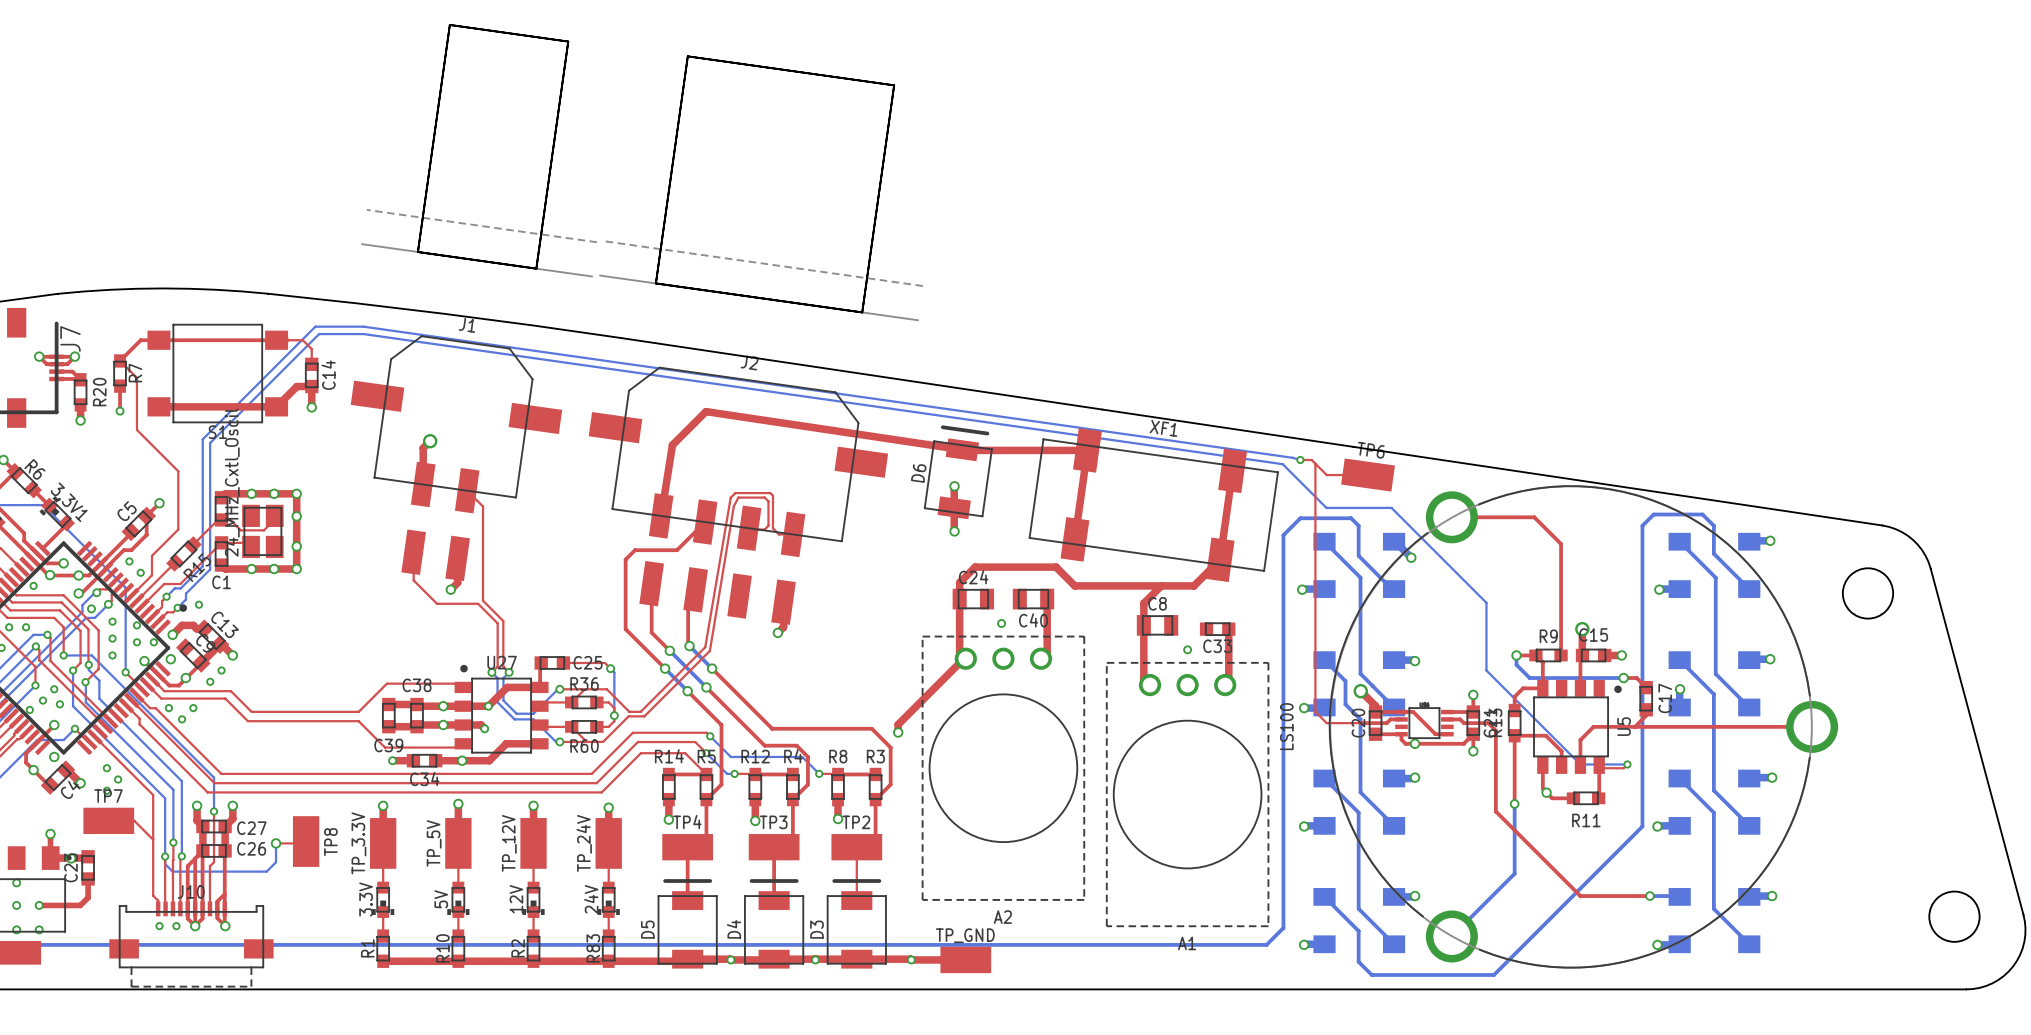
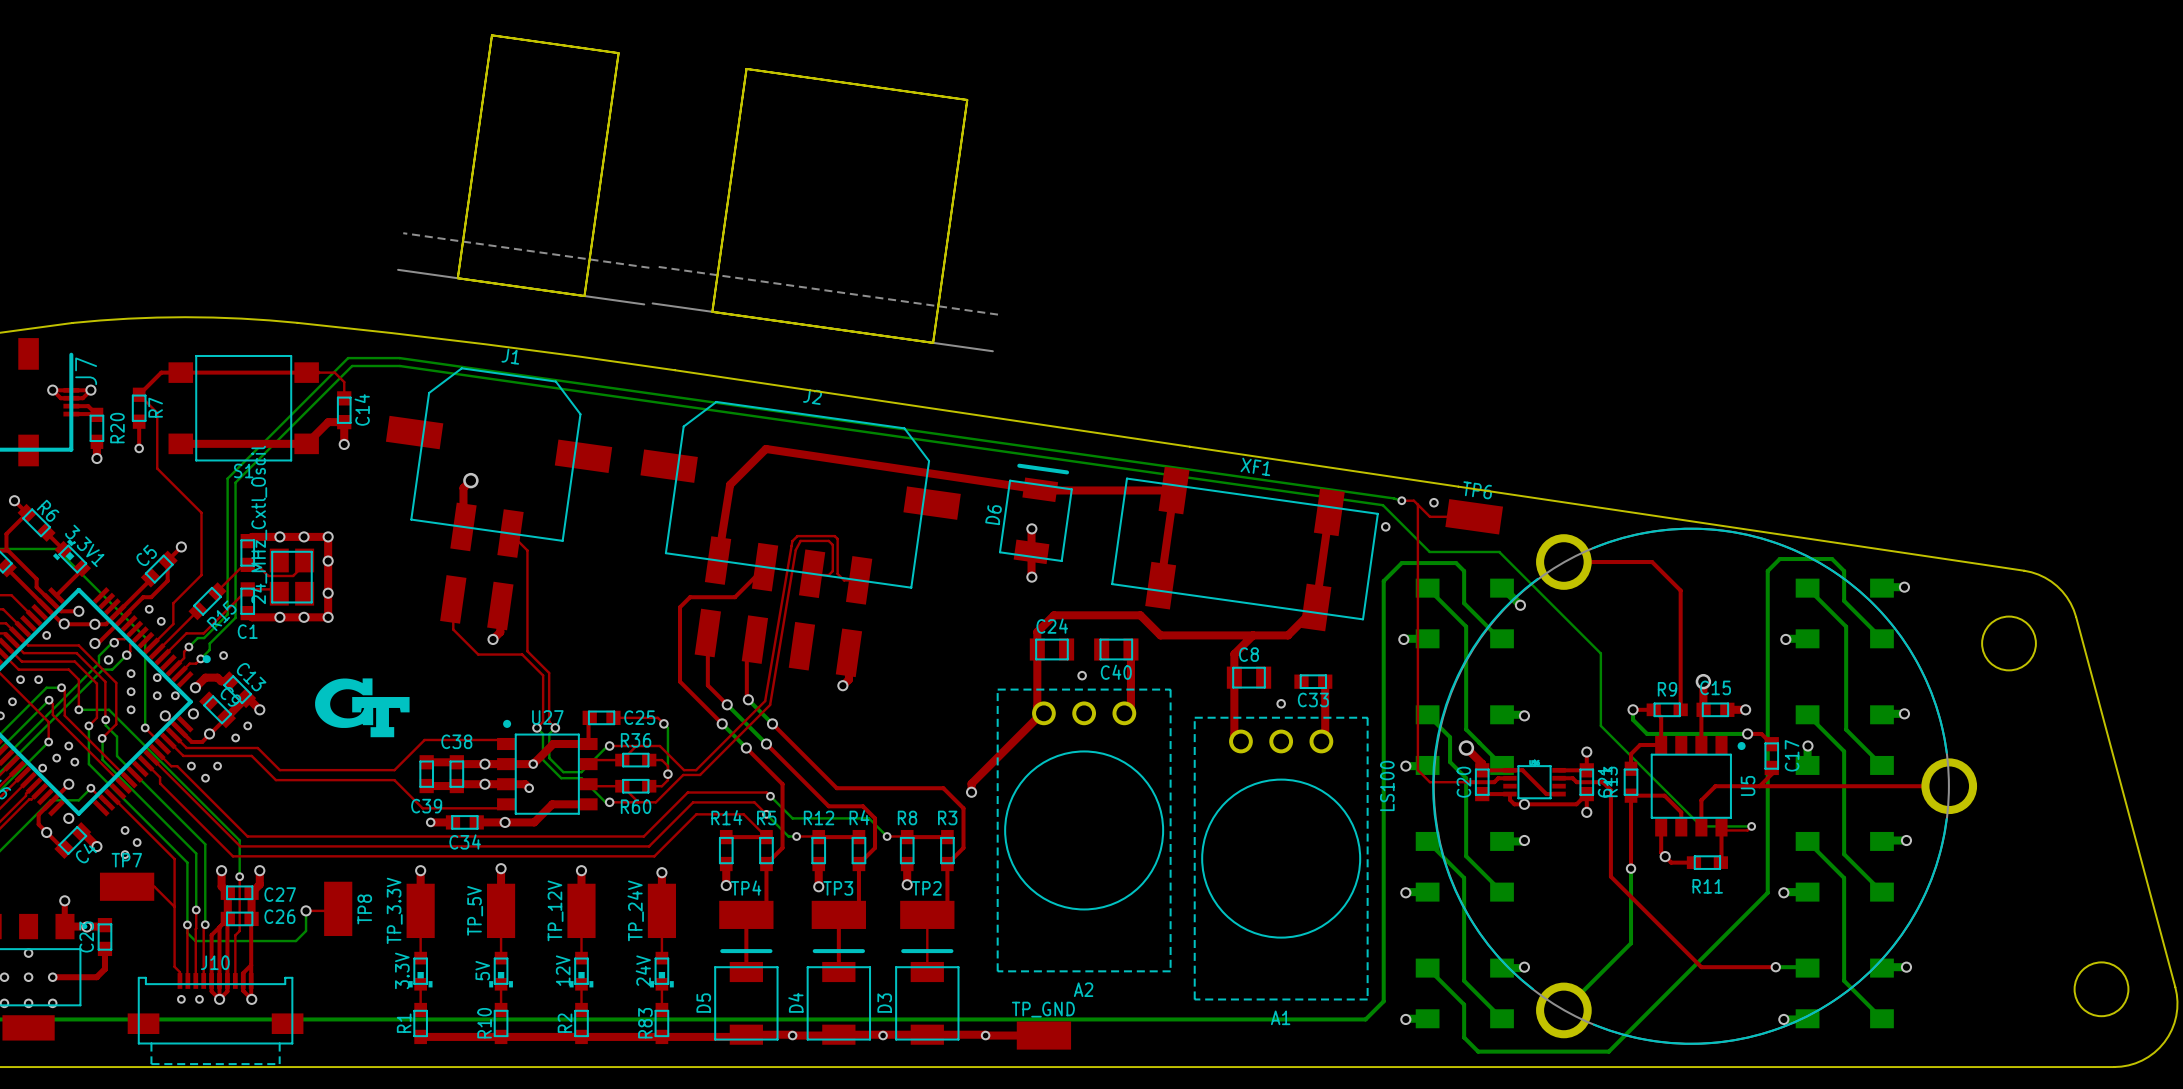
via: none -> (1433, 502)
via: none -> (1385, 526)
drawing: none -> [315, 678, 410, 738]

